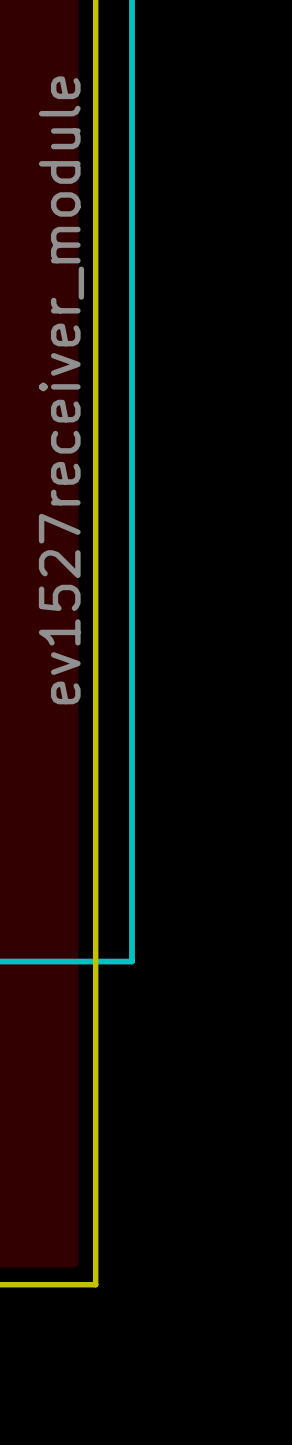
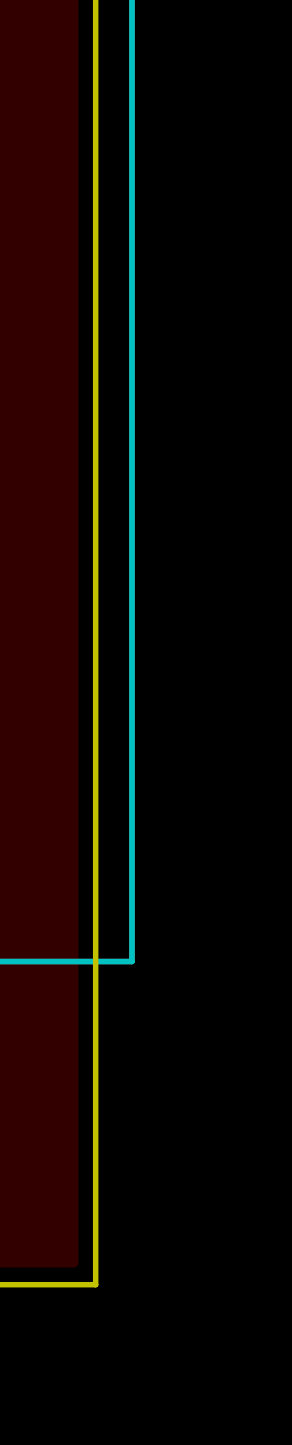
part value: ev1527receiver_module (61, 390) -> none

